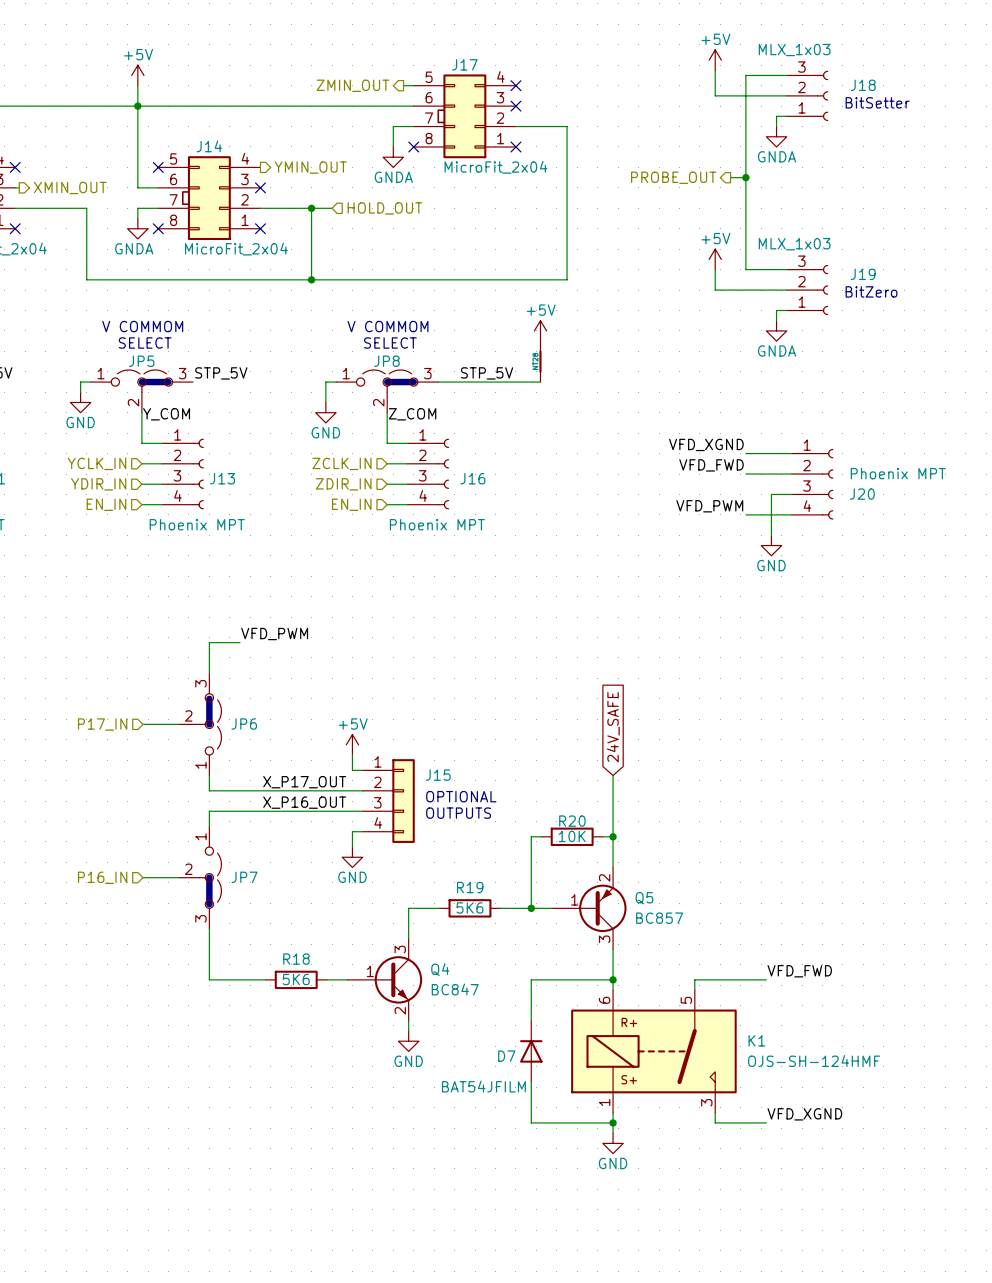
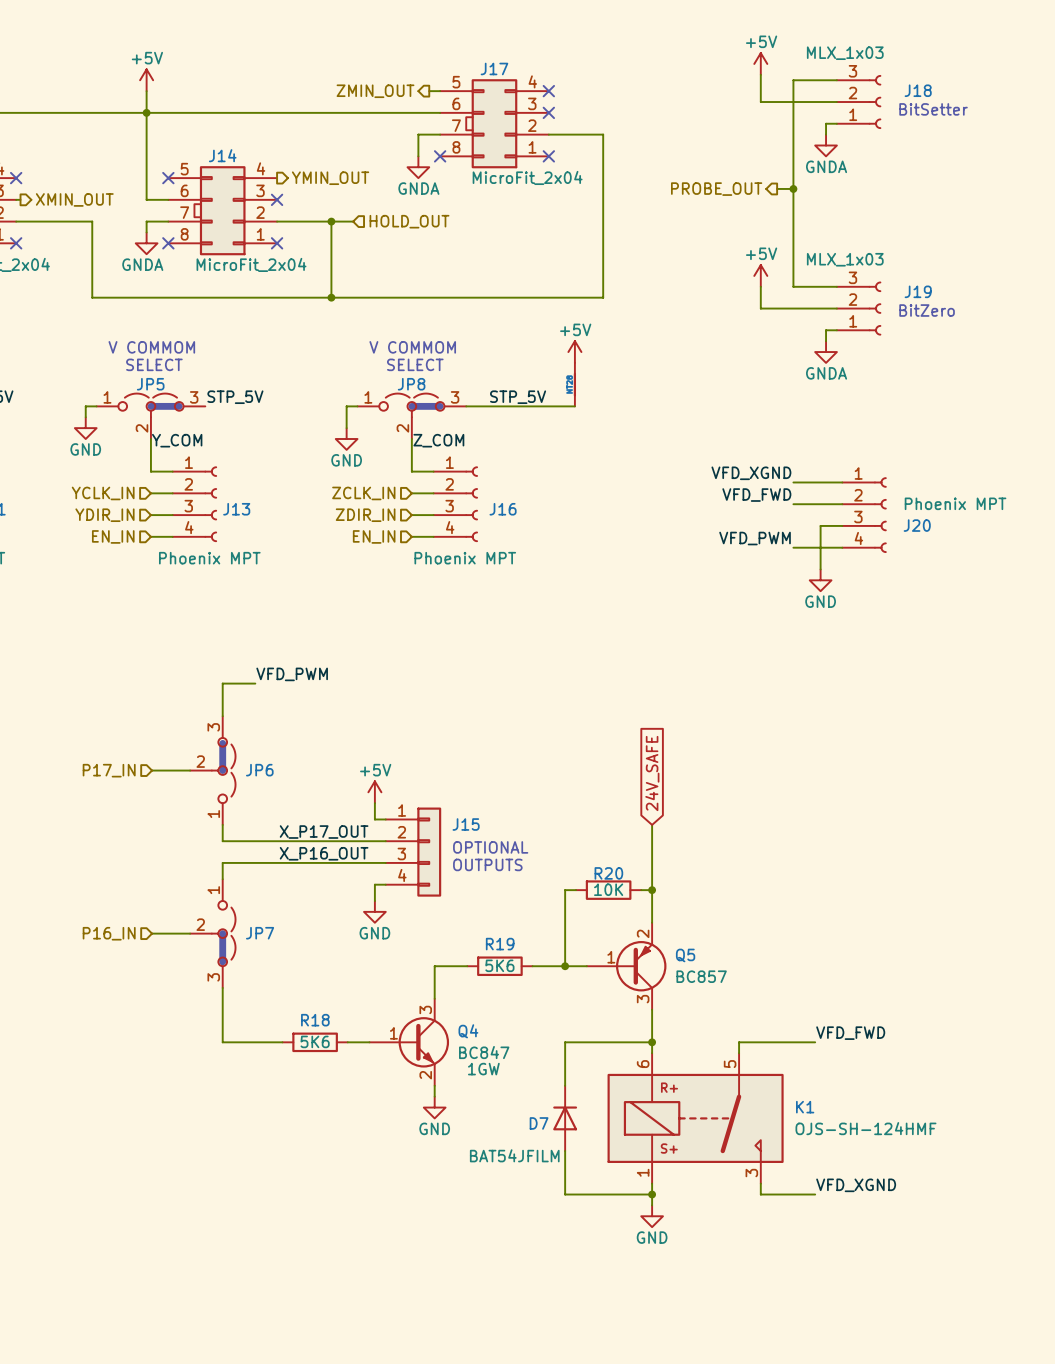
Q4 text: none -> 1GW (483, 1069)

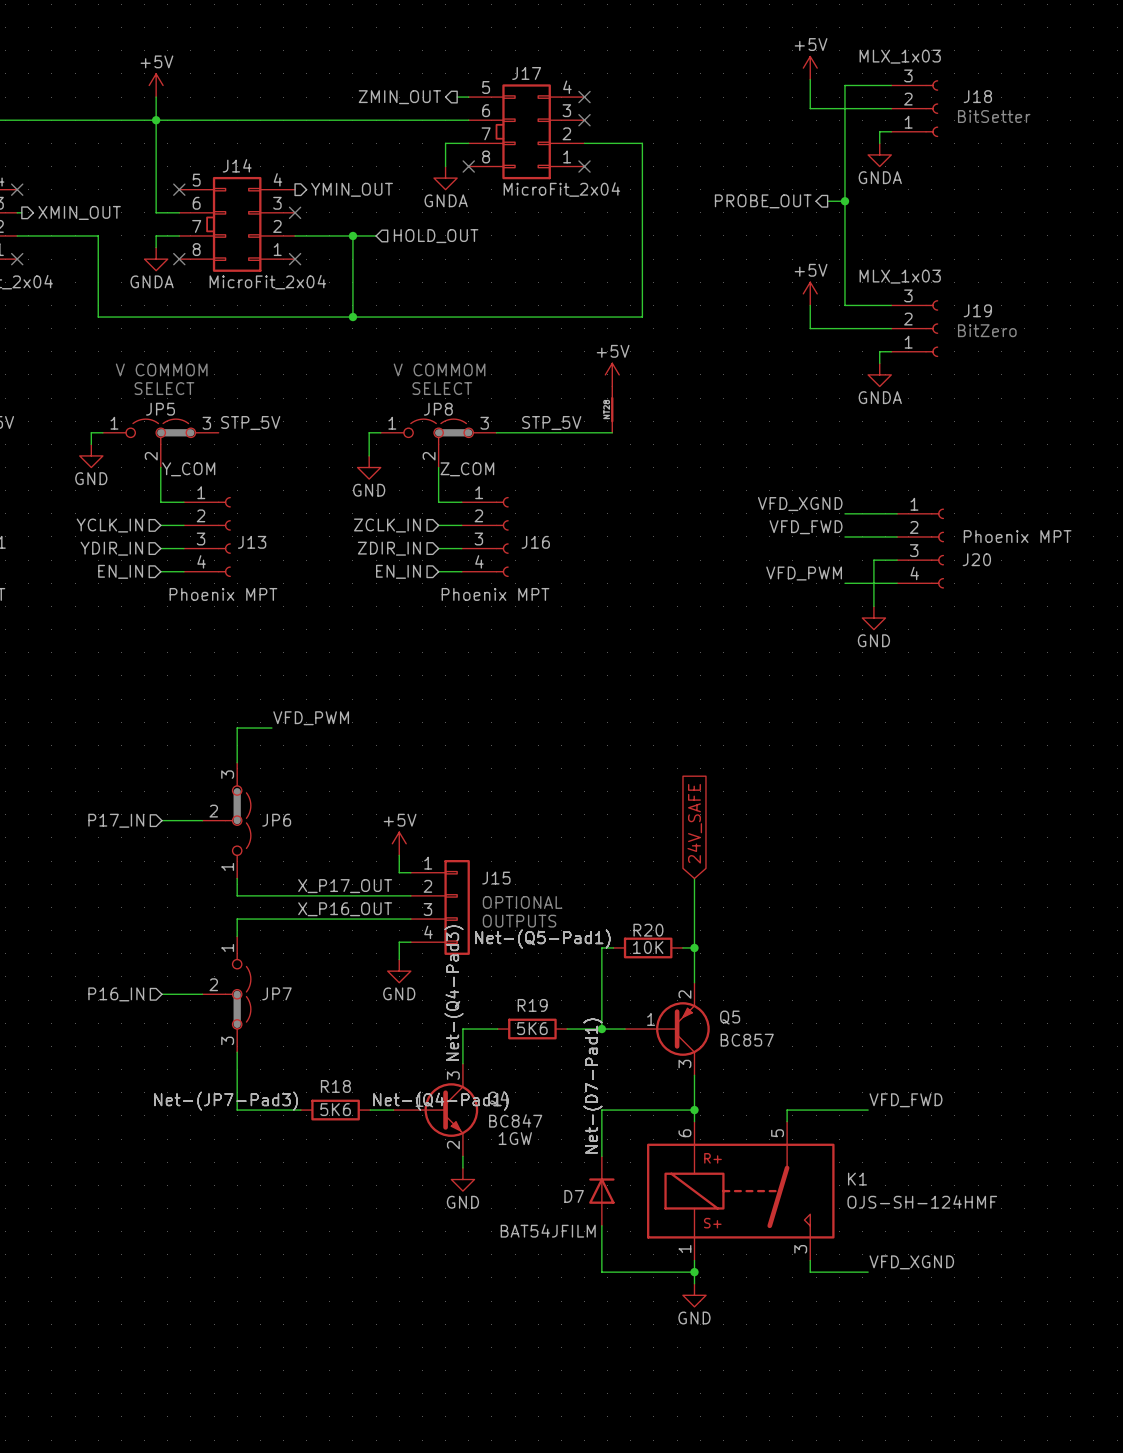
label: none -> Net-(Q5-Pad1) (542, 939)
label: none -> Net-(Q4-Pad3) (453, 993)
label: none -> Net-(D7-Pad1) (592, 1085)
label: none -> Net-(JP7-Pad3) (226, 1101)
label: none -> Net-(Q4-Pad1) (440, 1101)

